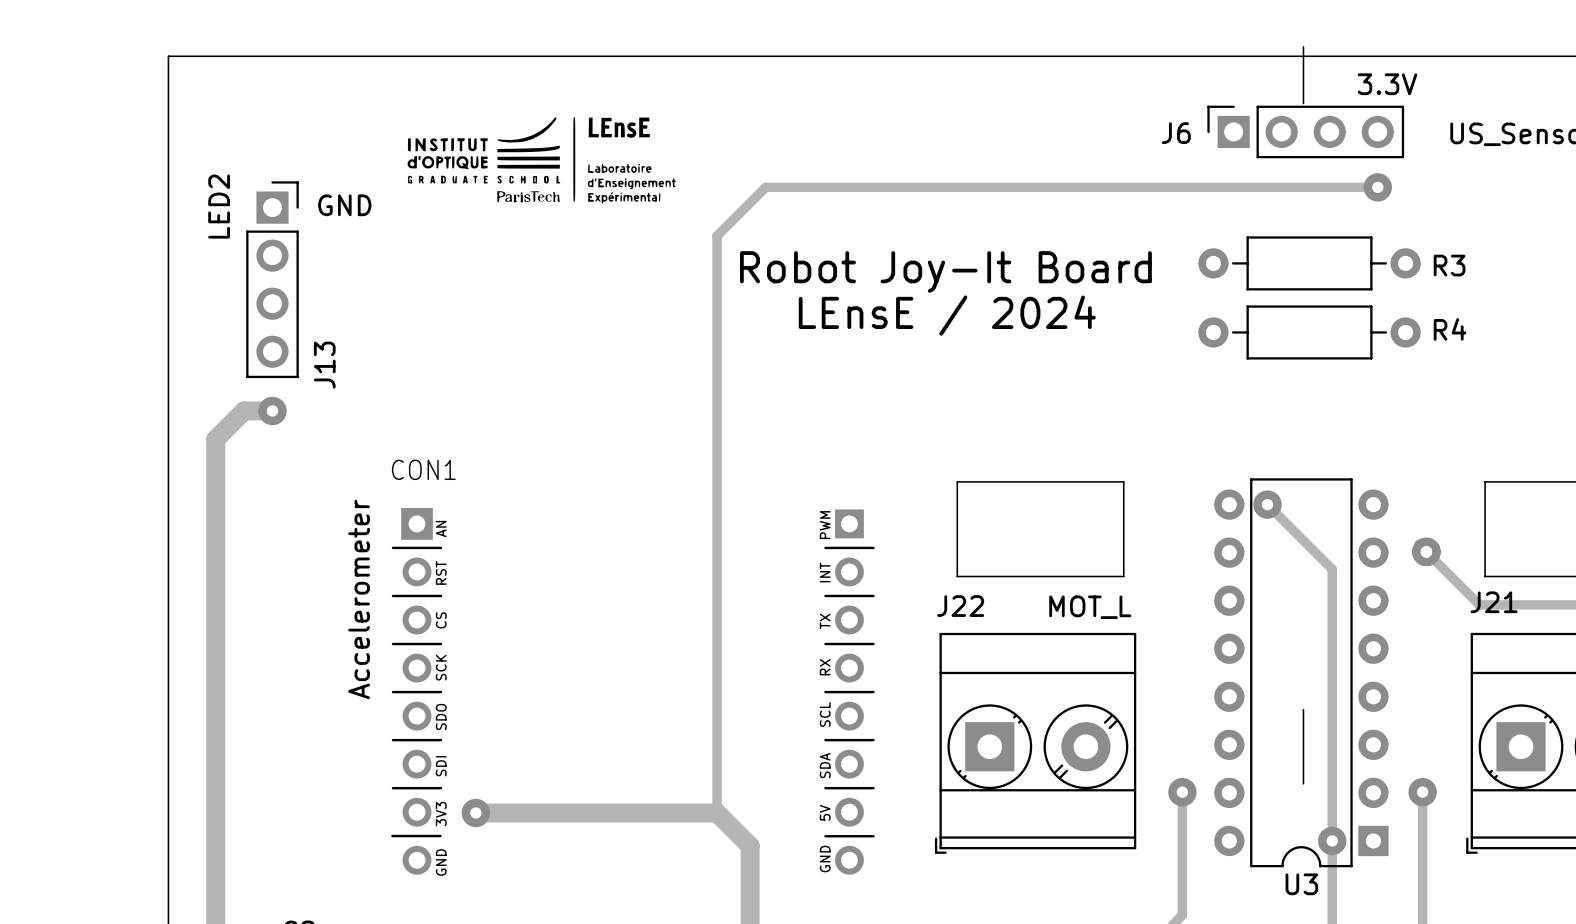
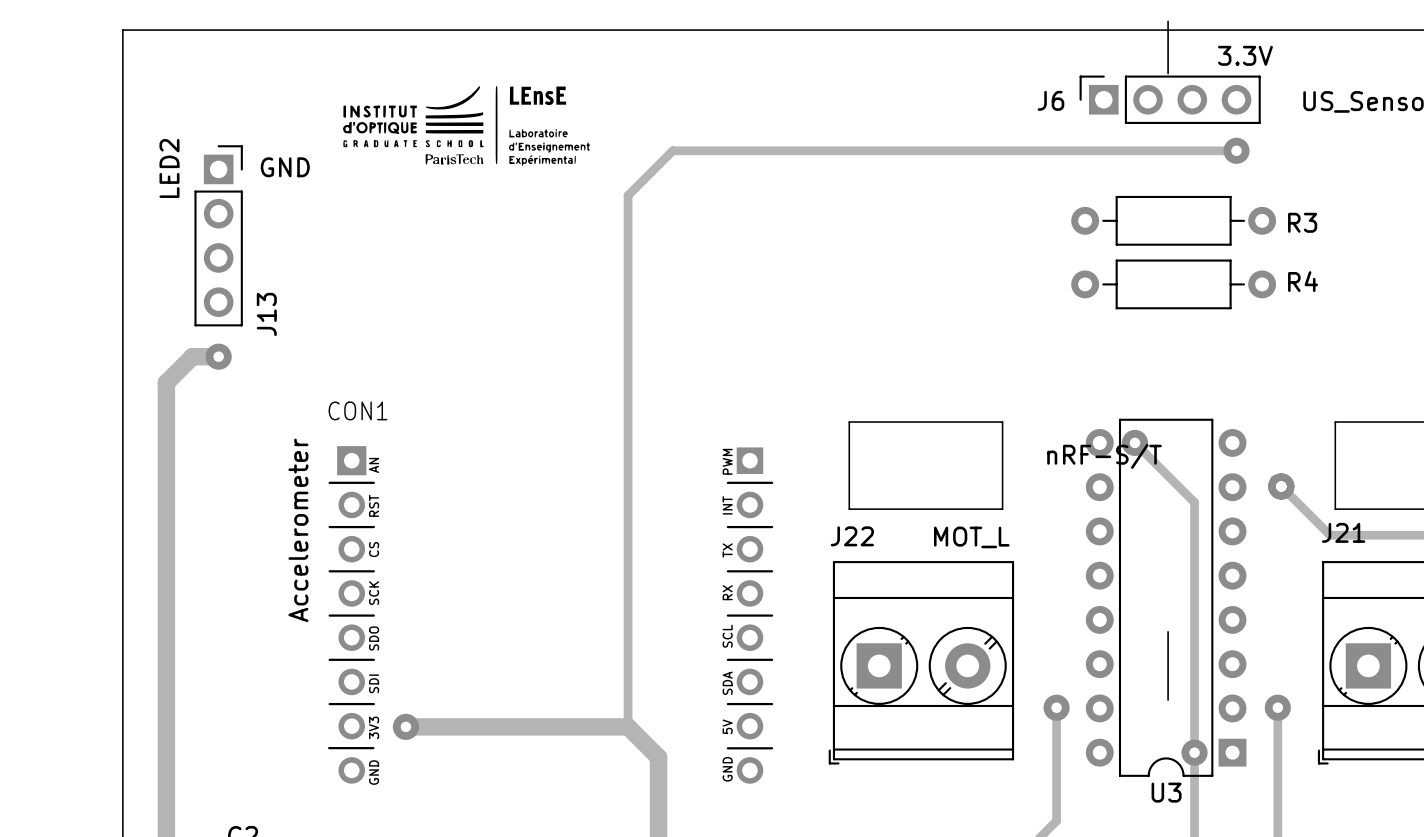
text: Robot Joy-It Board (945, 271) -> none
text: LEnsE / 2024 (947, 315) -> none
text: none -> nRF-S/T (1104, 456)

